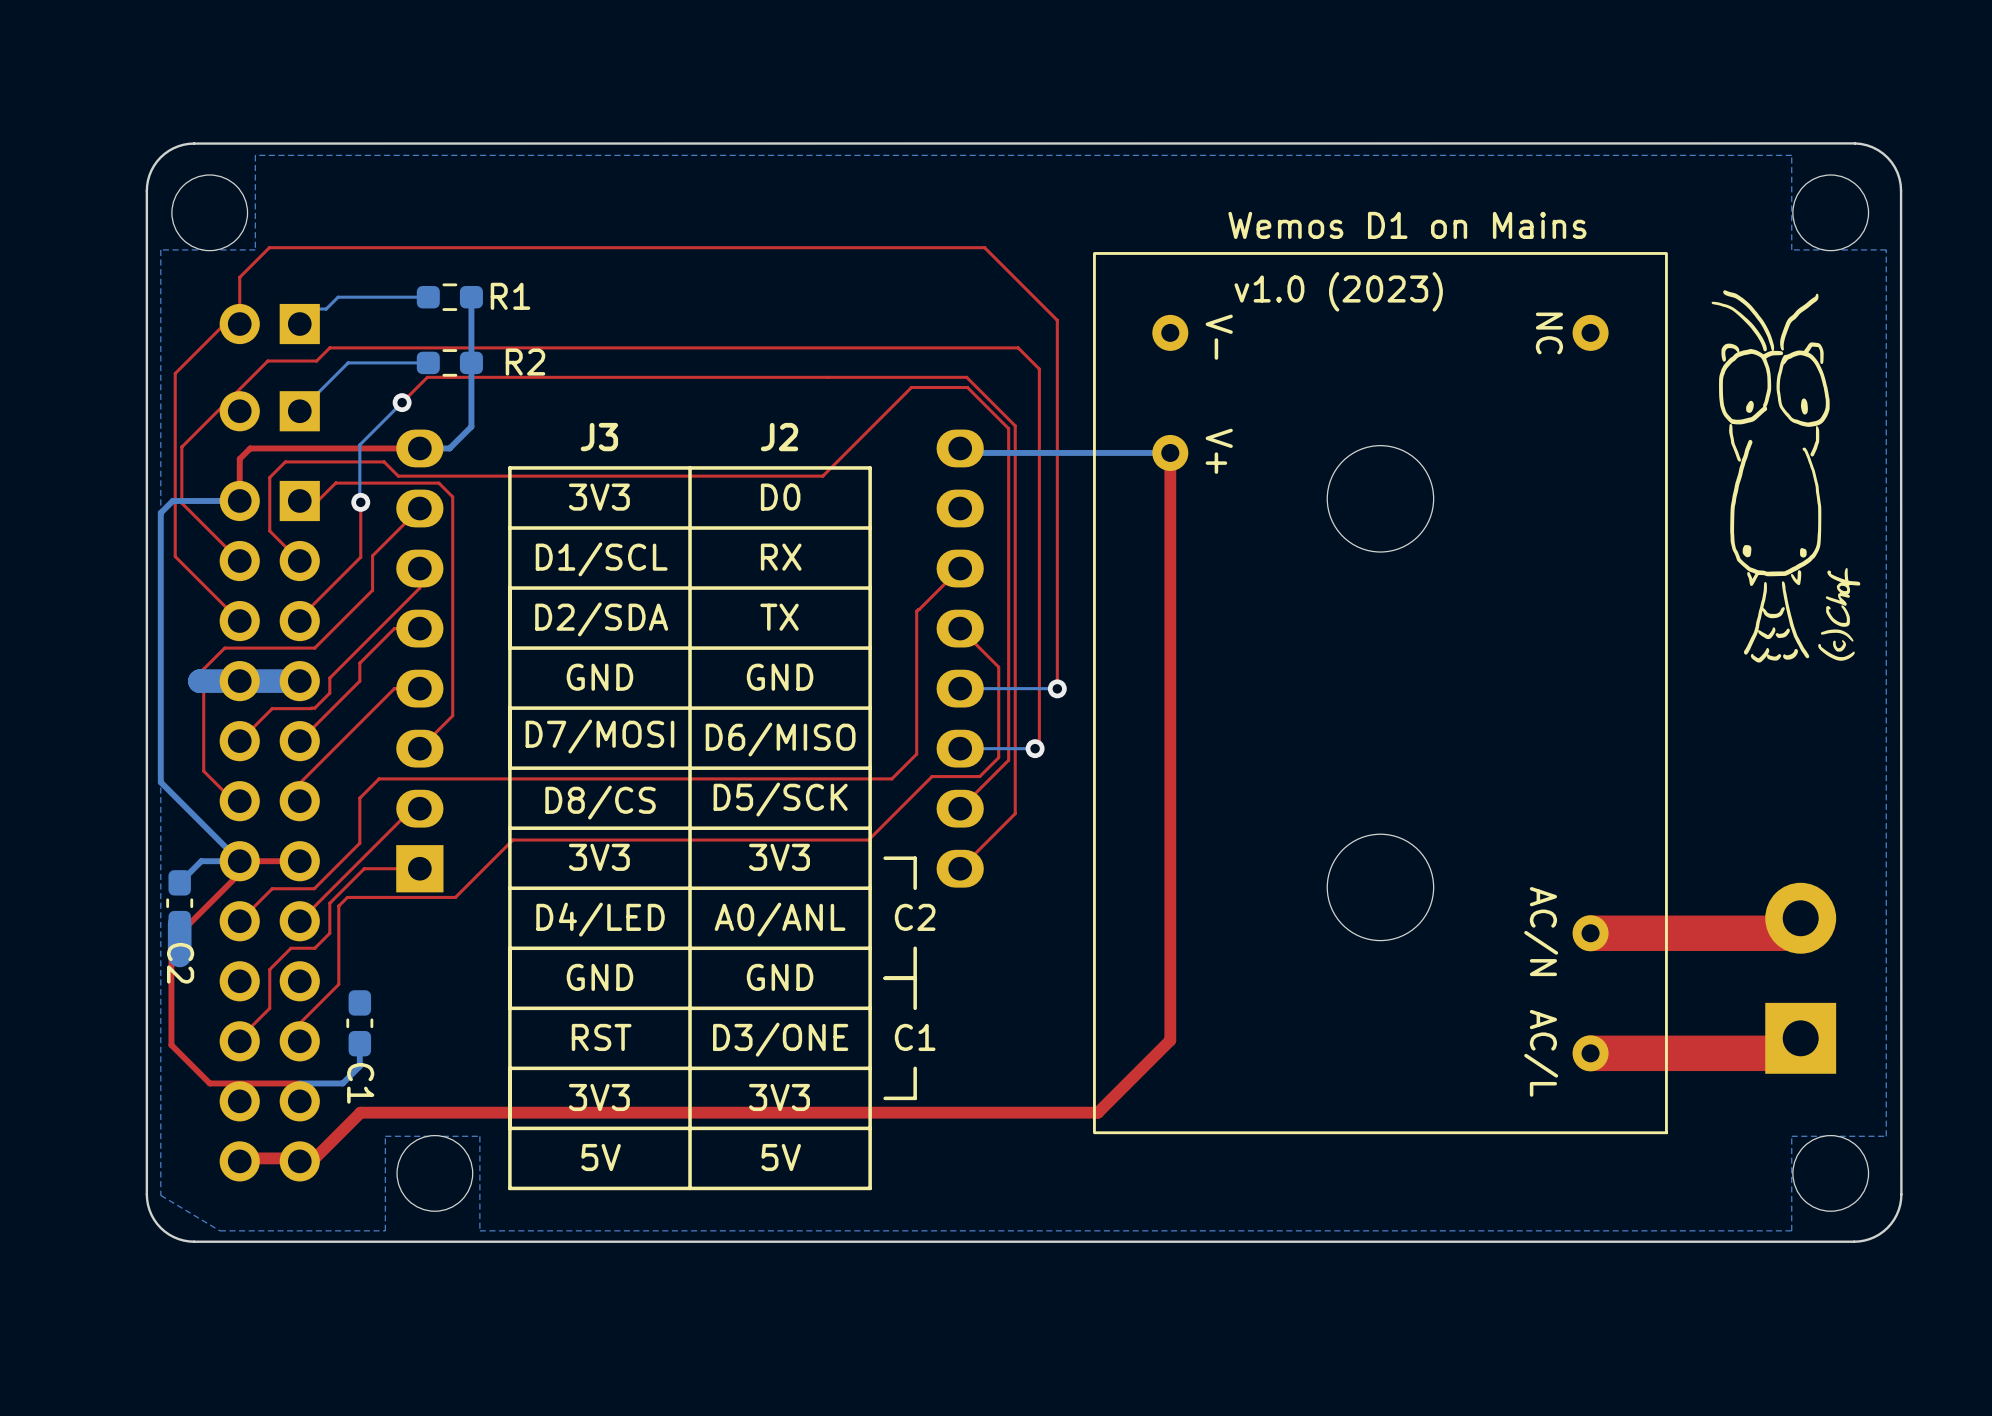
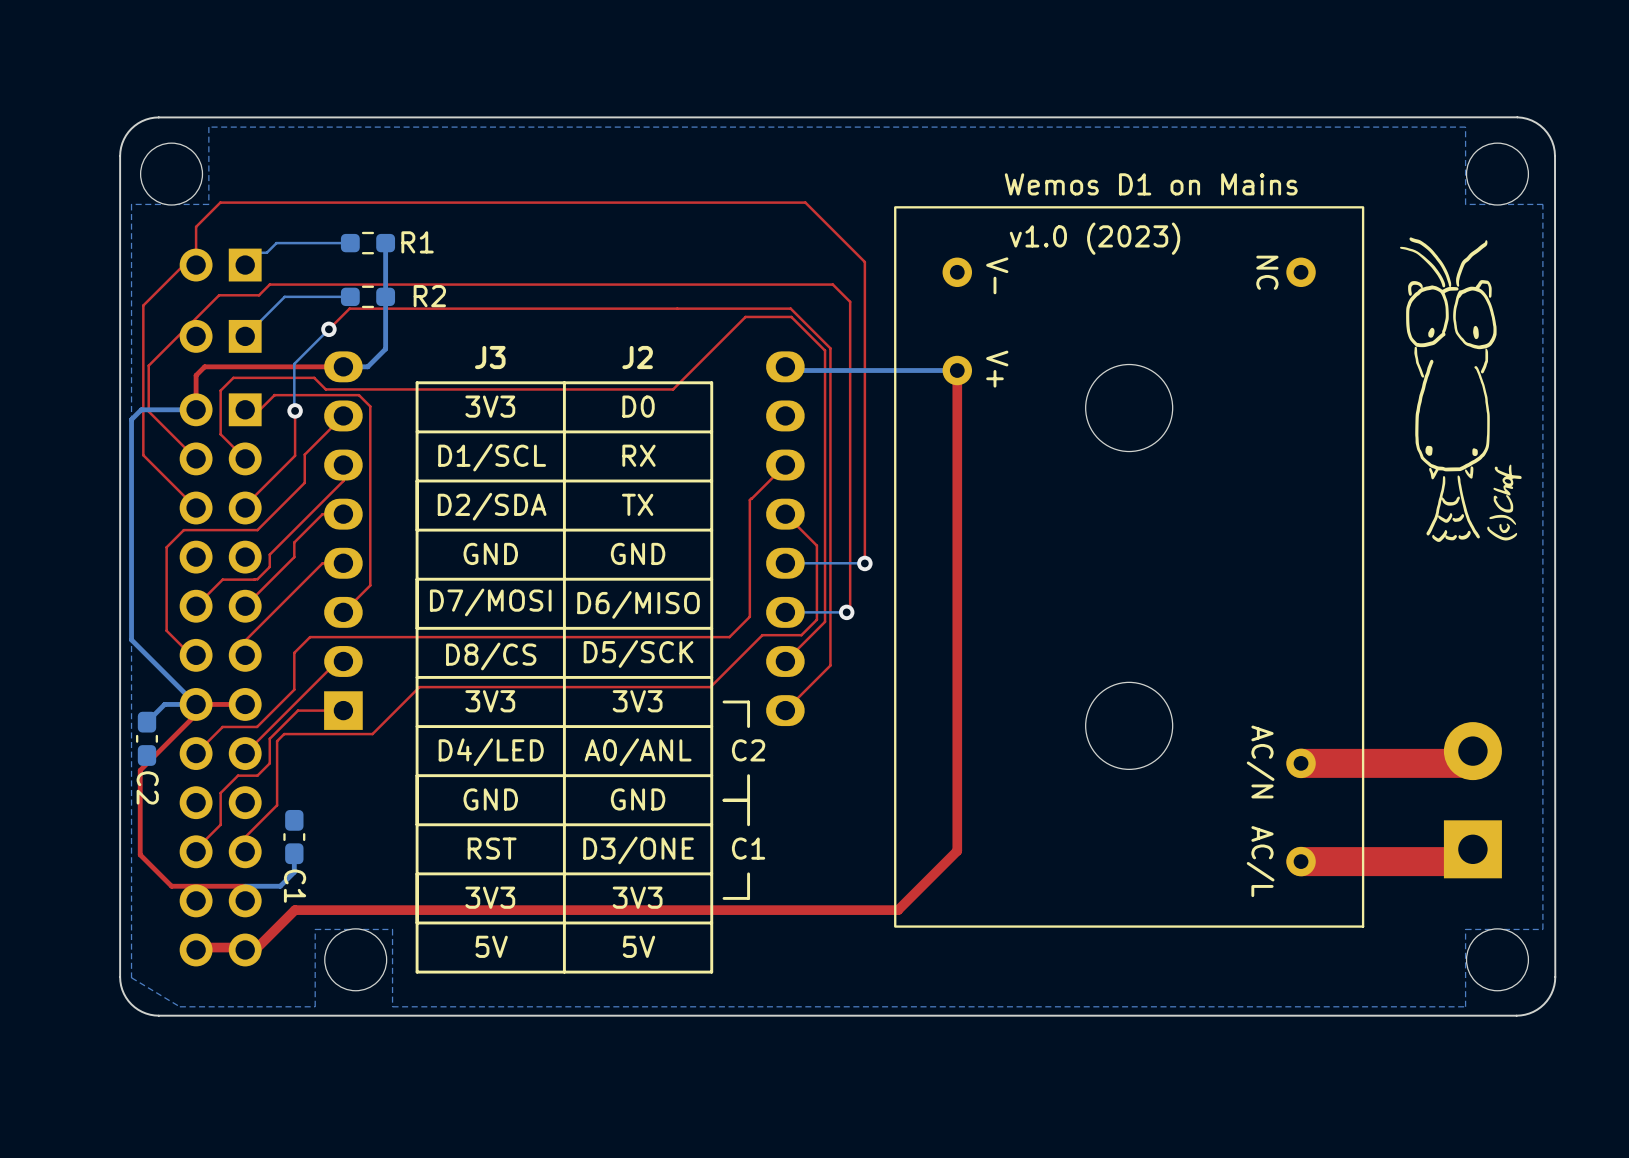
bottom track: (299, 681) (199, 681) -> none
bottom track: (179, 923) (179, 955) -> none

